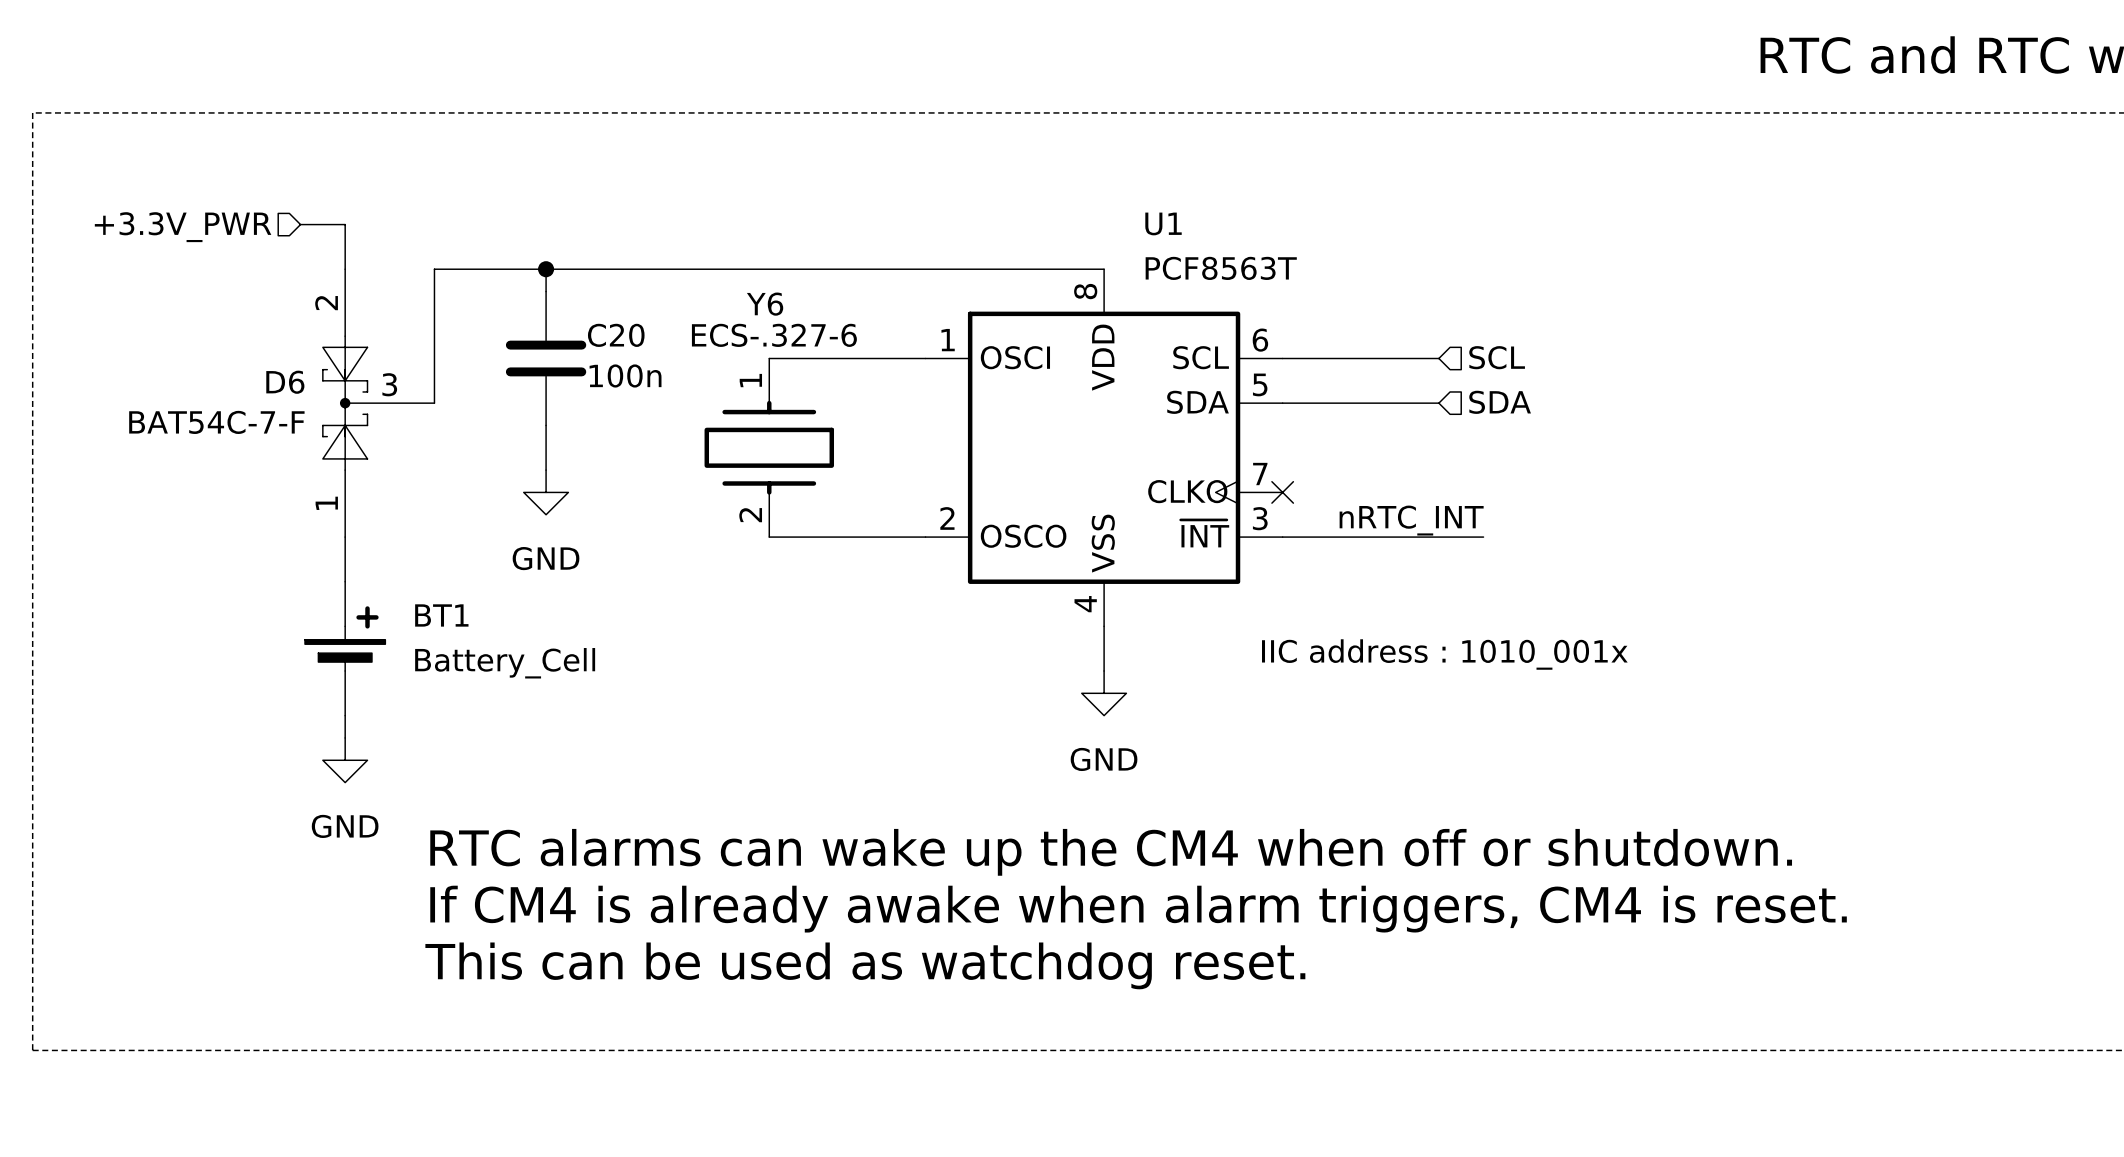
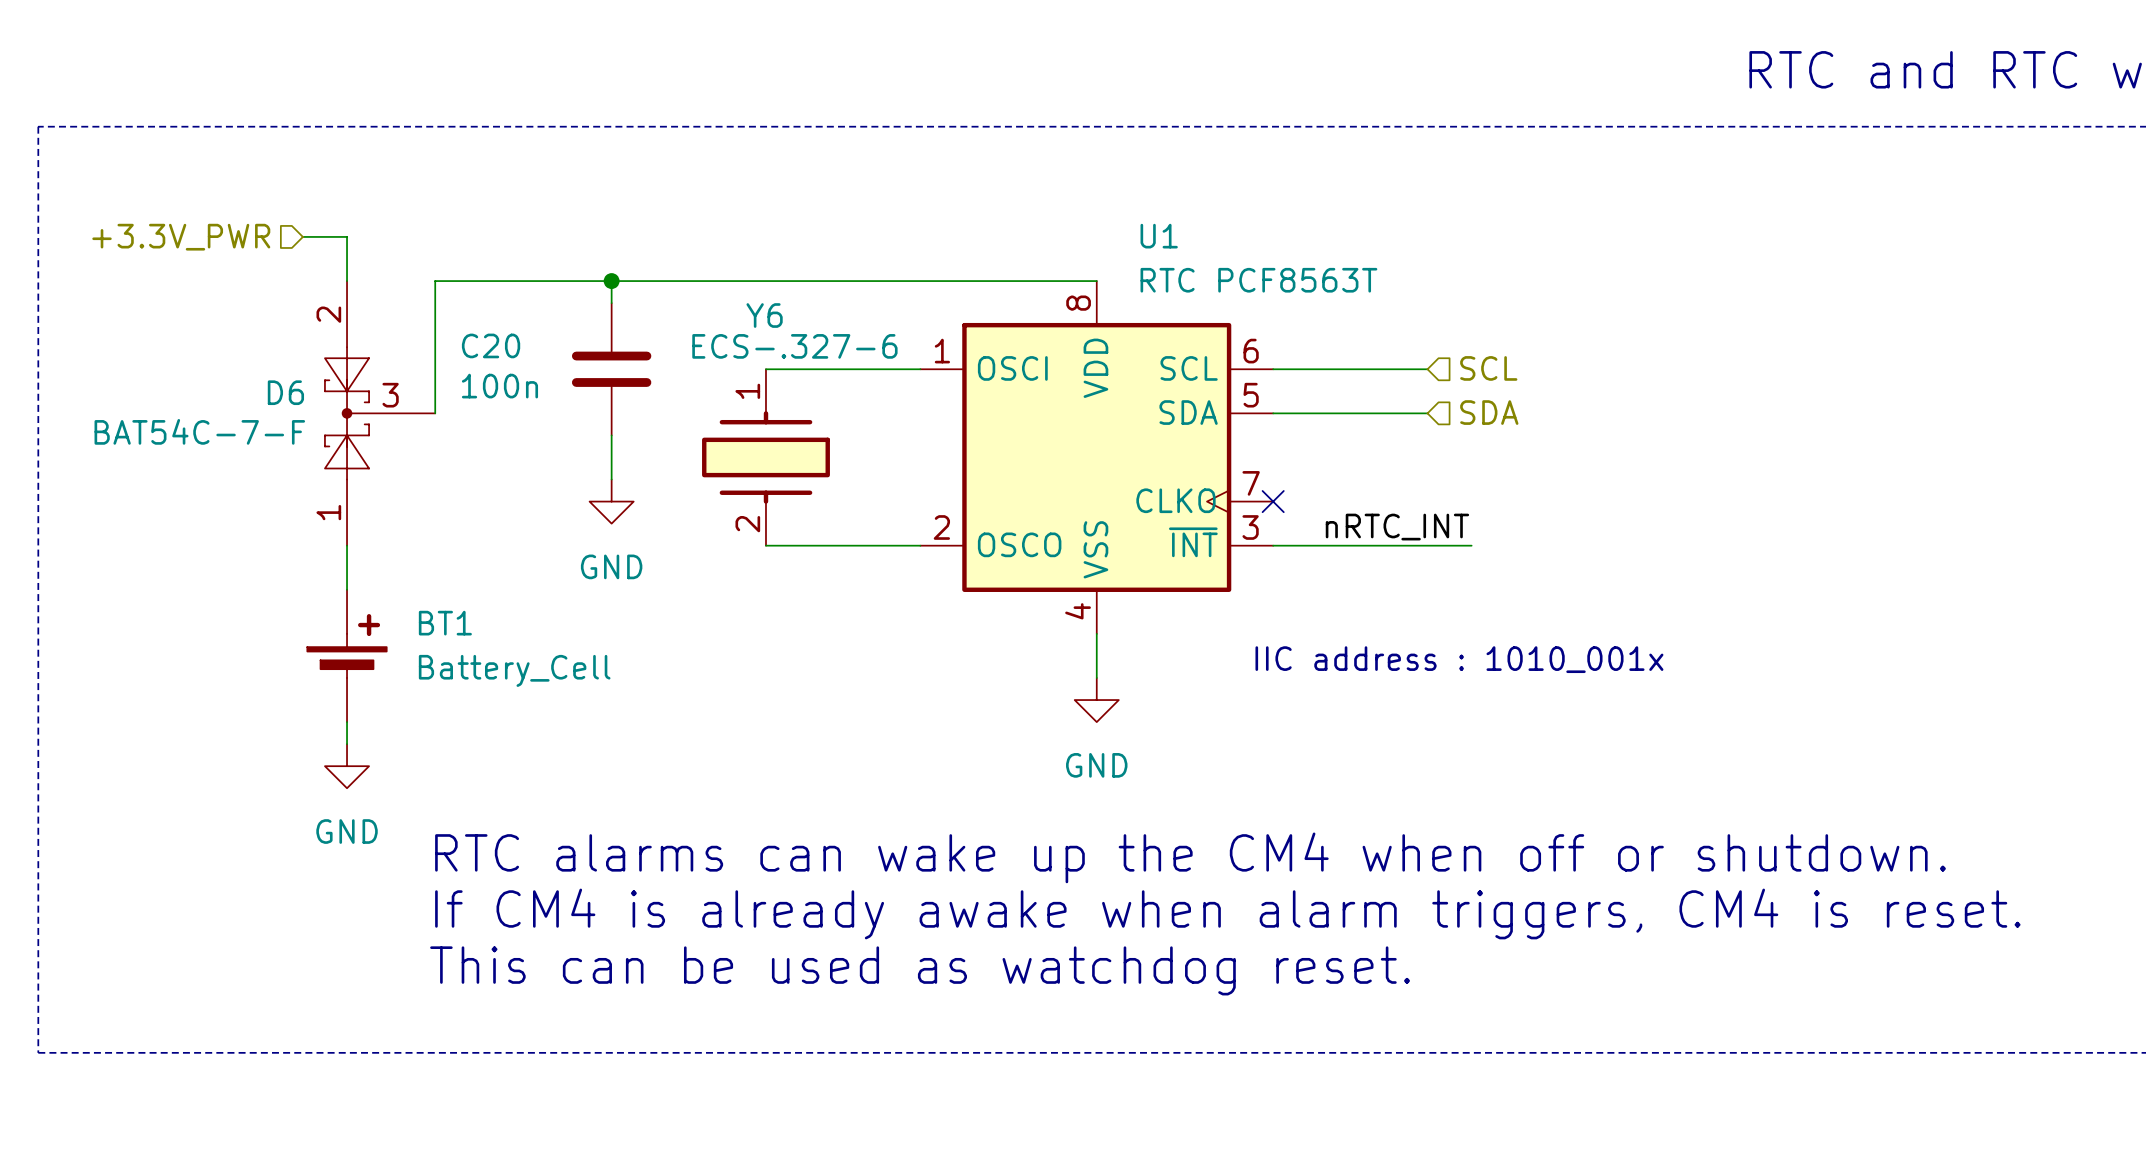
U1 value: PCF8563T (1221, 268) -> RTC PCF8563T (1258, 280)
wire: (546, 269) (546, 291) -> (611, 281) (611, 303)
junction position: (546, 269) -> (611, 281)
C20 name position: C20 (616, 335) -> C20 (491, 345)
C20 position: (546, 358) -> (611, 369)
C20 value position: 100n (625, 375) -> 100n (499, 386)
wire: (546, 425) (546, 470) -> (611, 435) (611, 479)
power symbol position: GND (546, 492) -> GND (611, 501)

